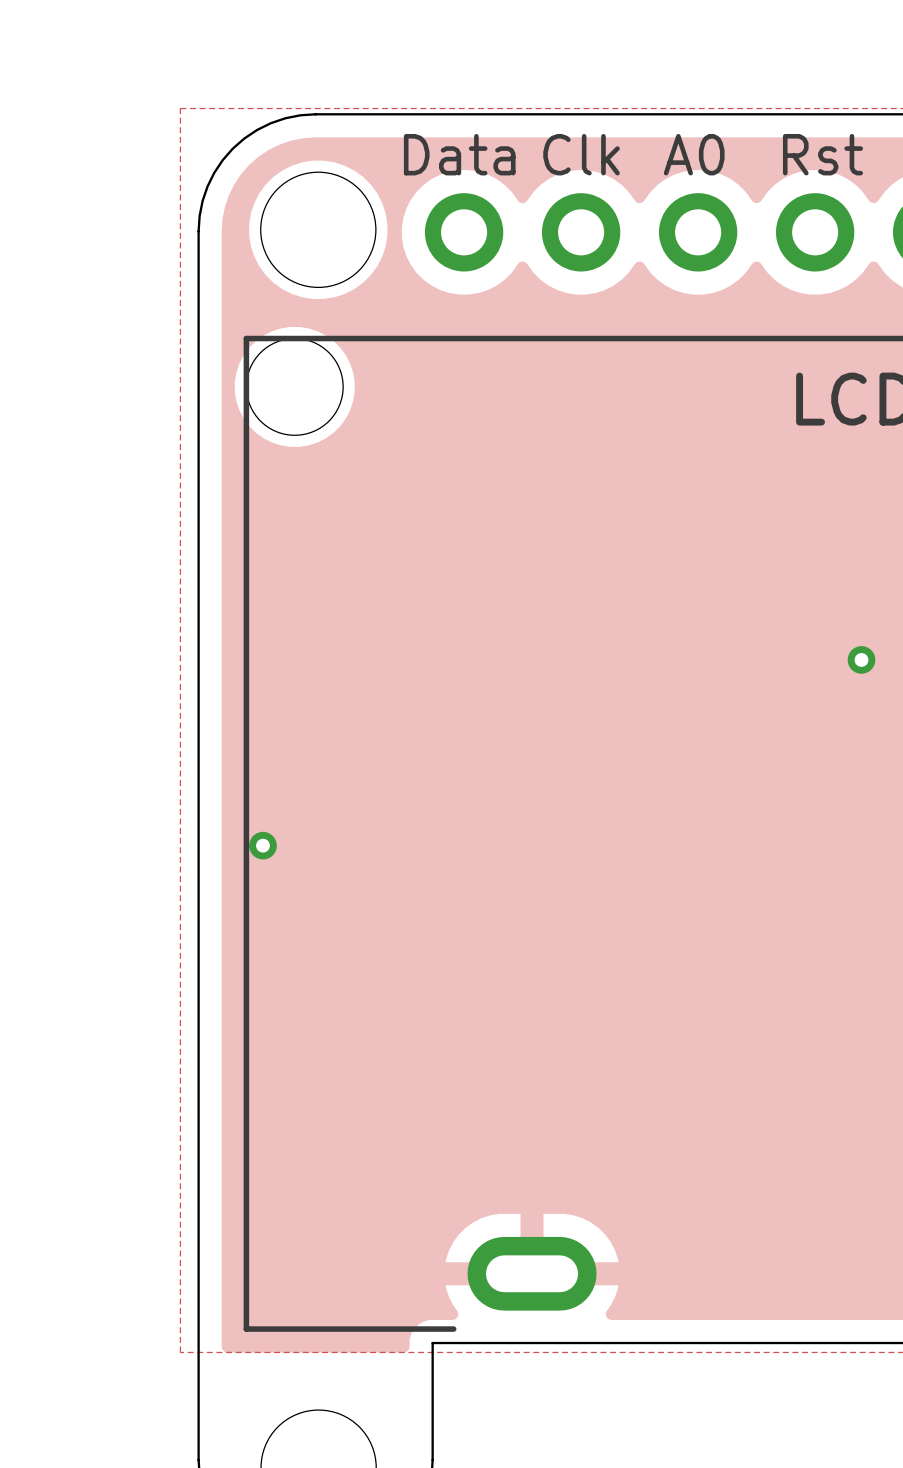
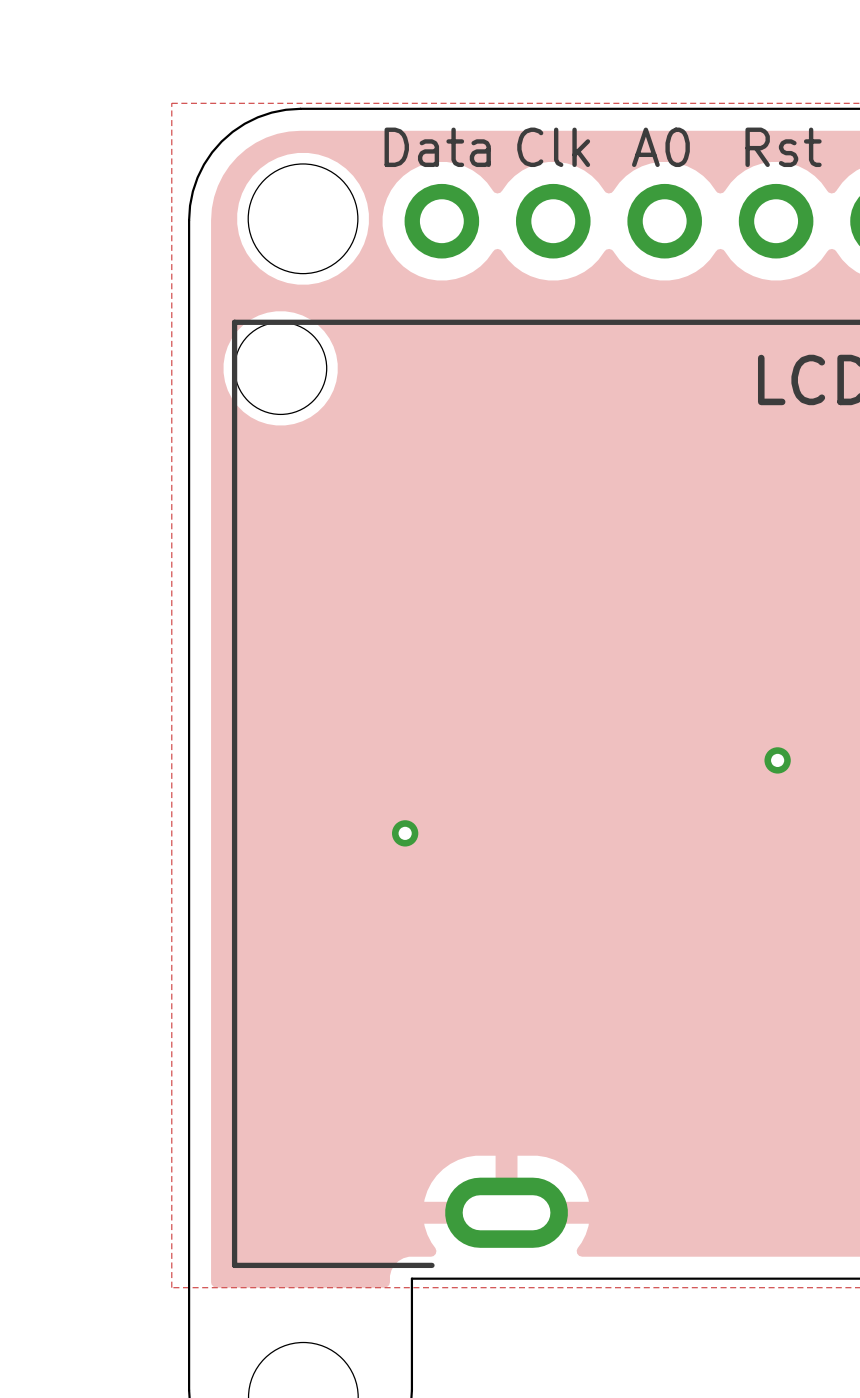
via position: (861, 659) -> (777, 760)
via position: (263, 845) -> (405, 833)

